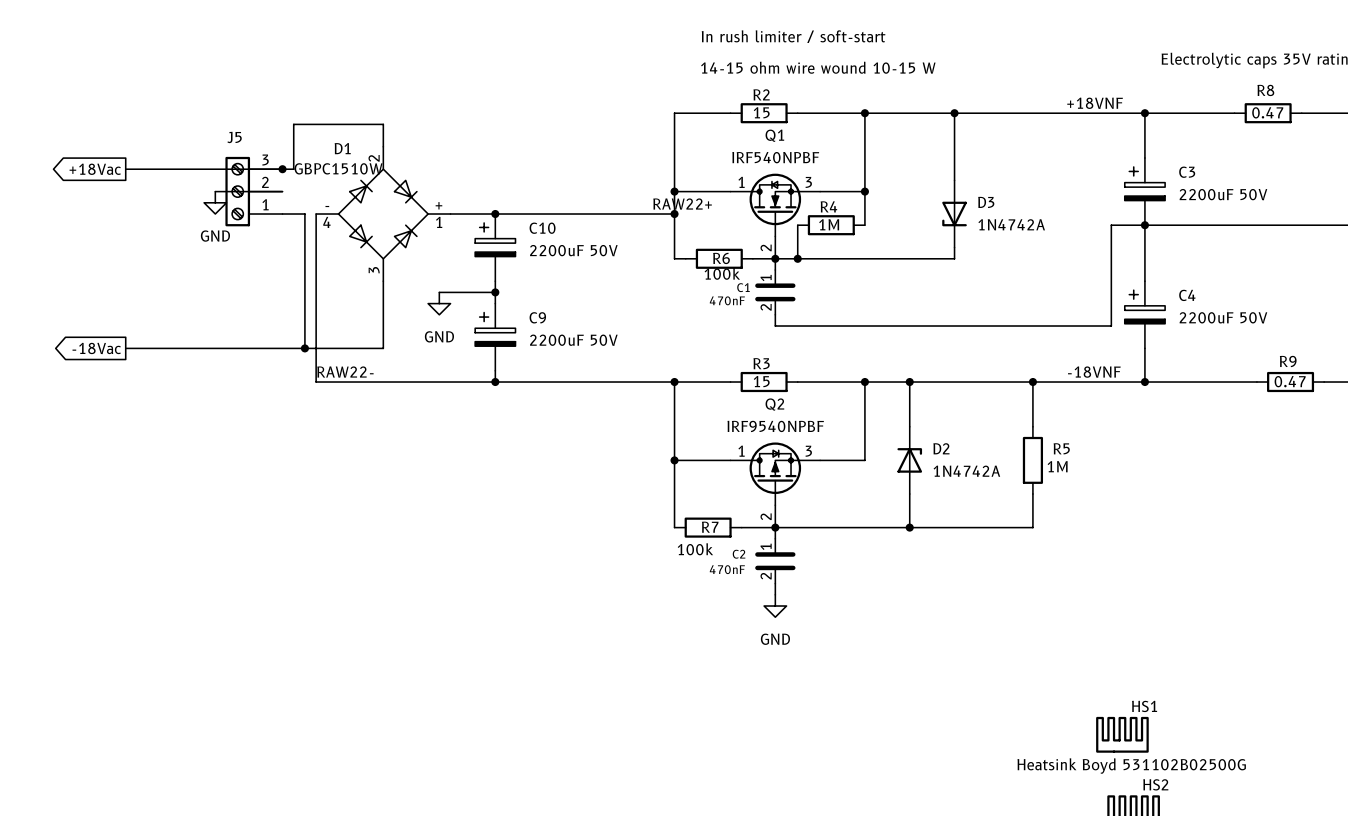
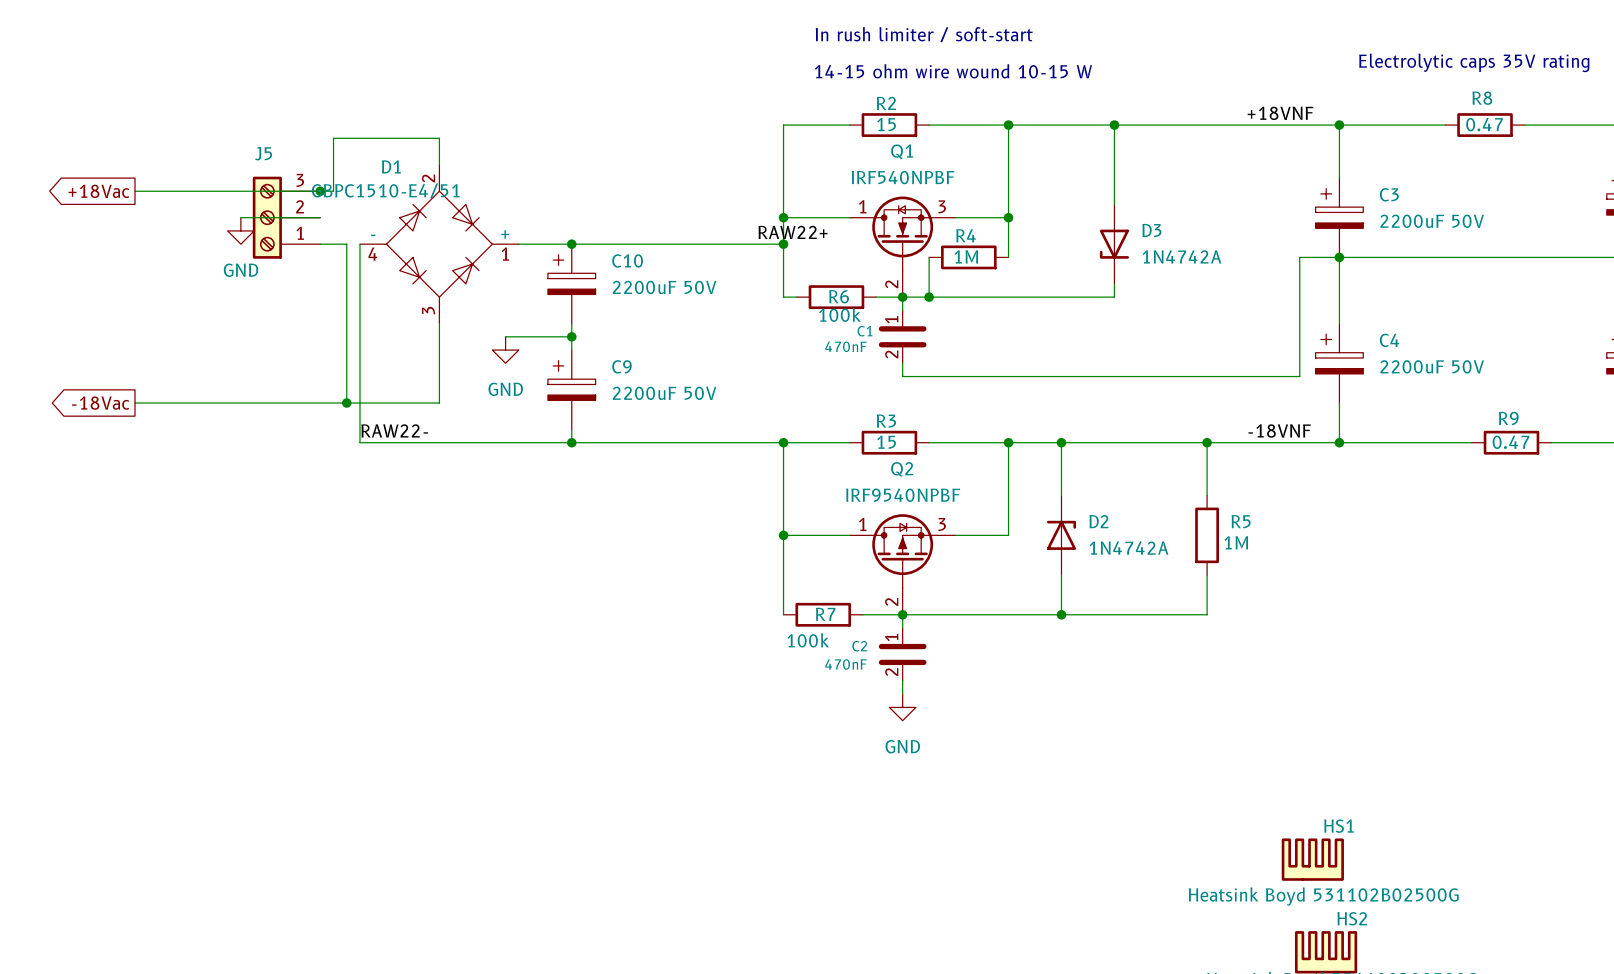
D1 value: GBPC1510W (338, 168) -> GBPC1510-E4/51 (385, 190)

